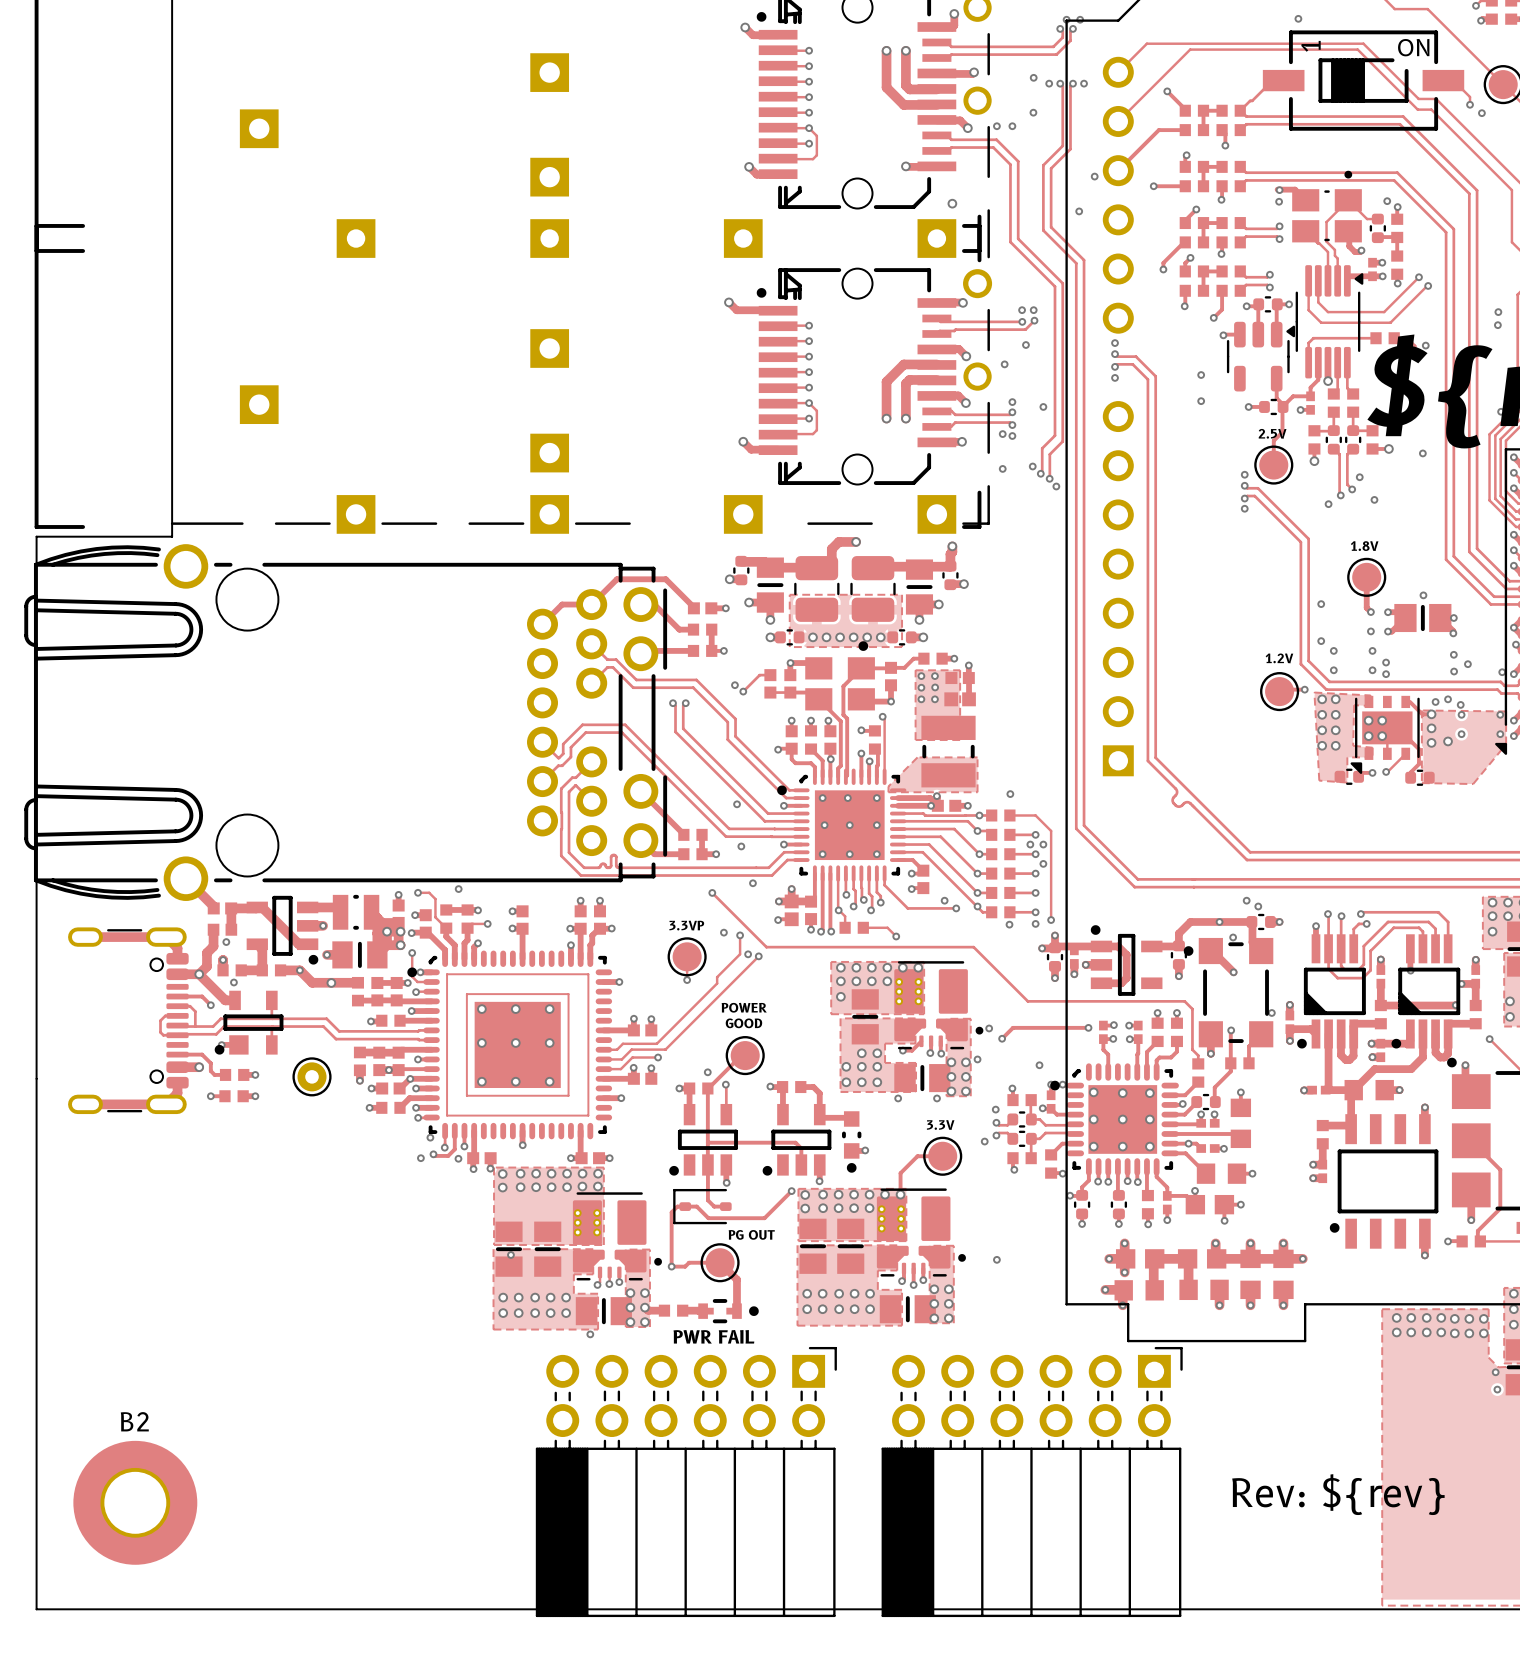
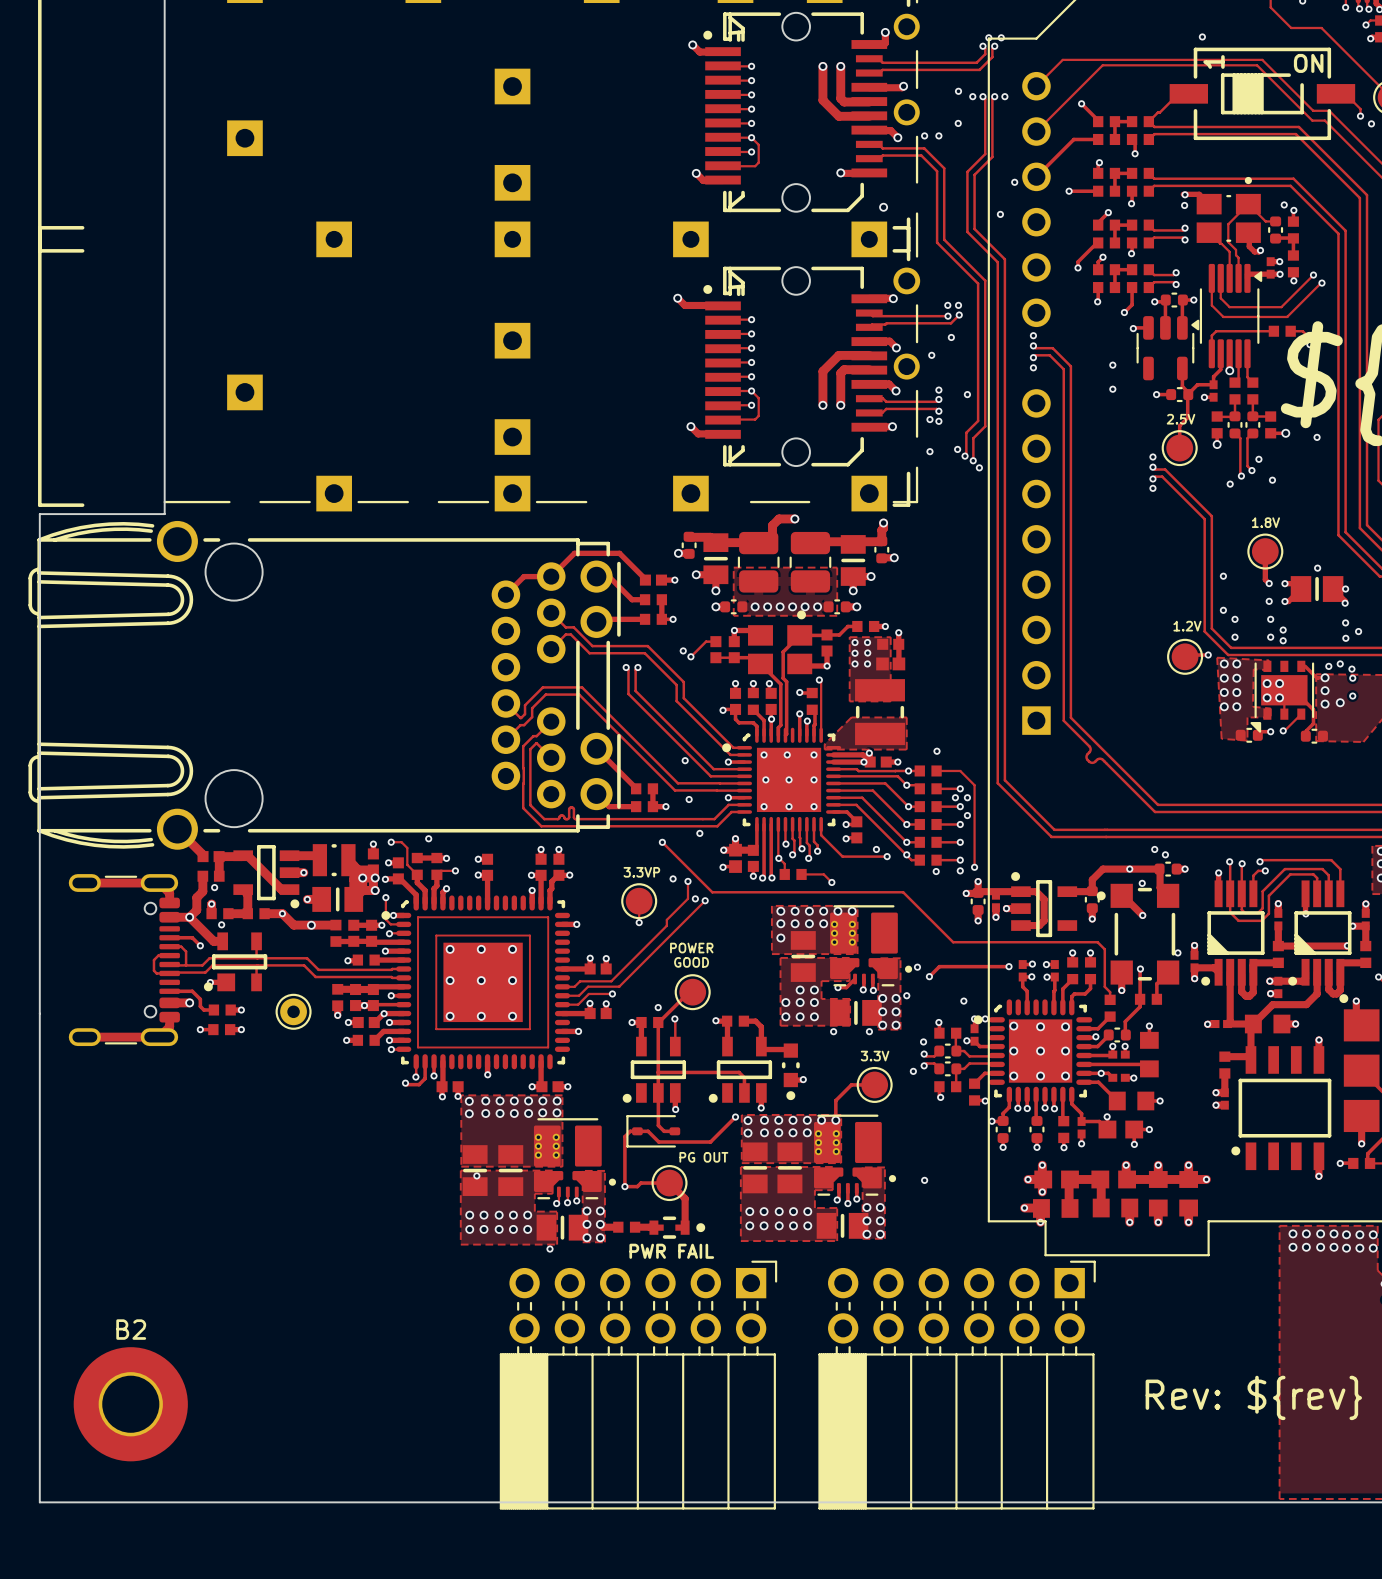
via: (430, 1137) -> none
via: (420, 1158) -> none
via: (458, 1158) -> none

